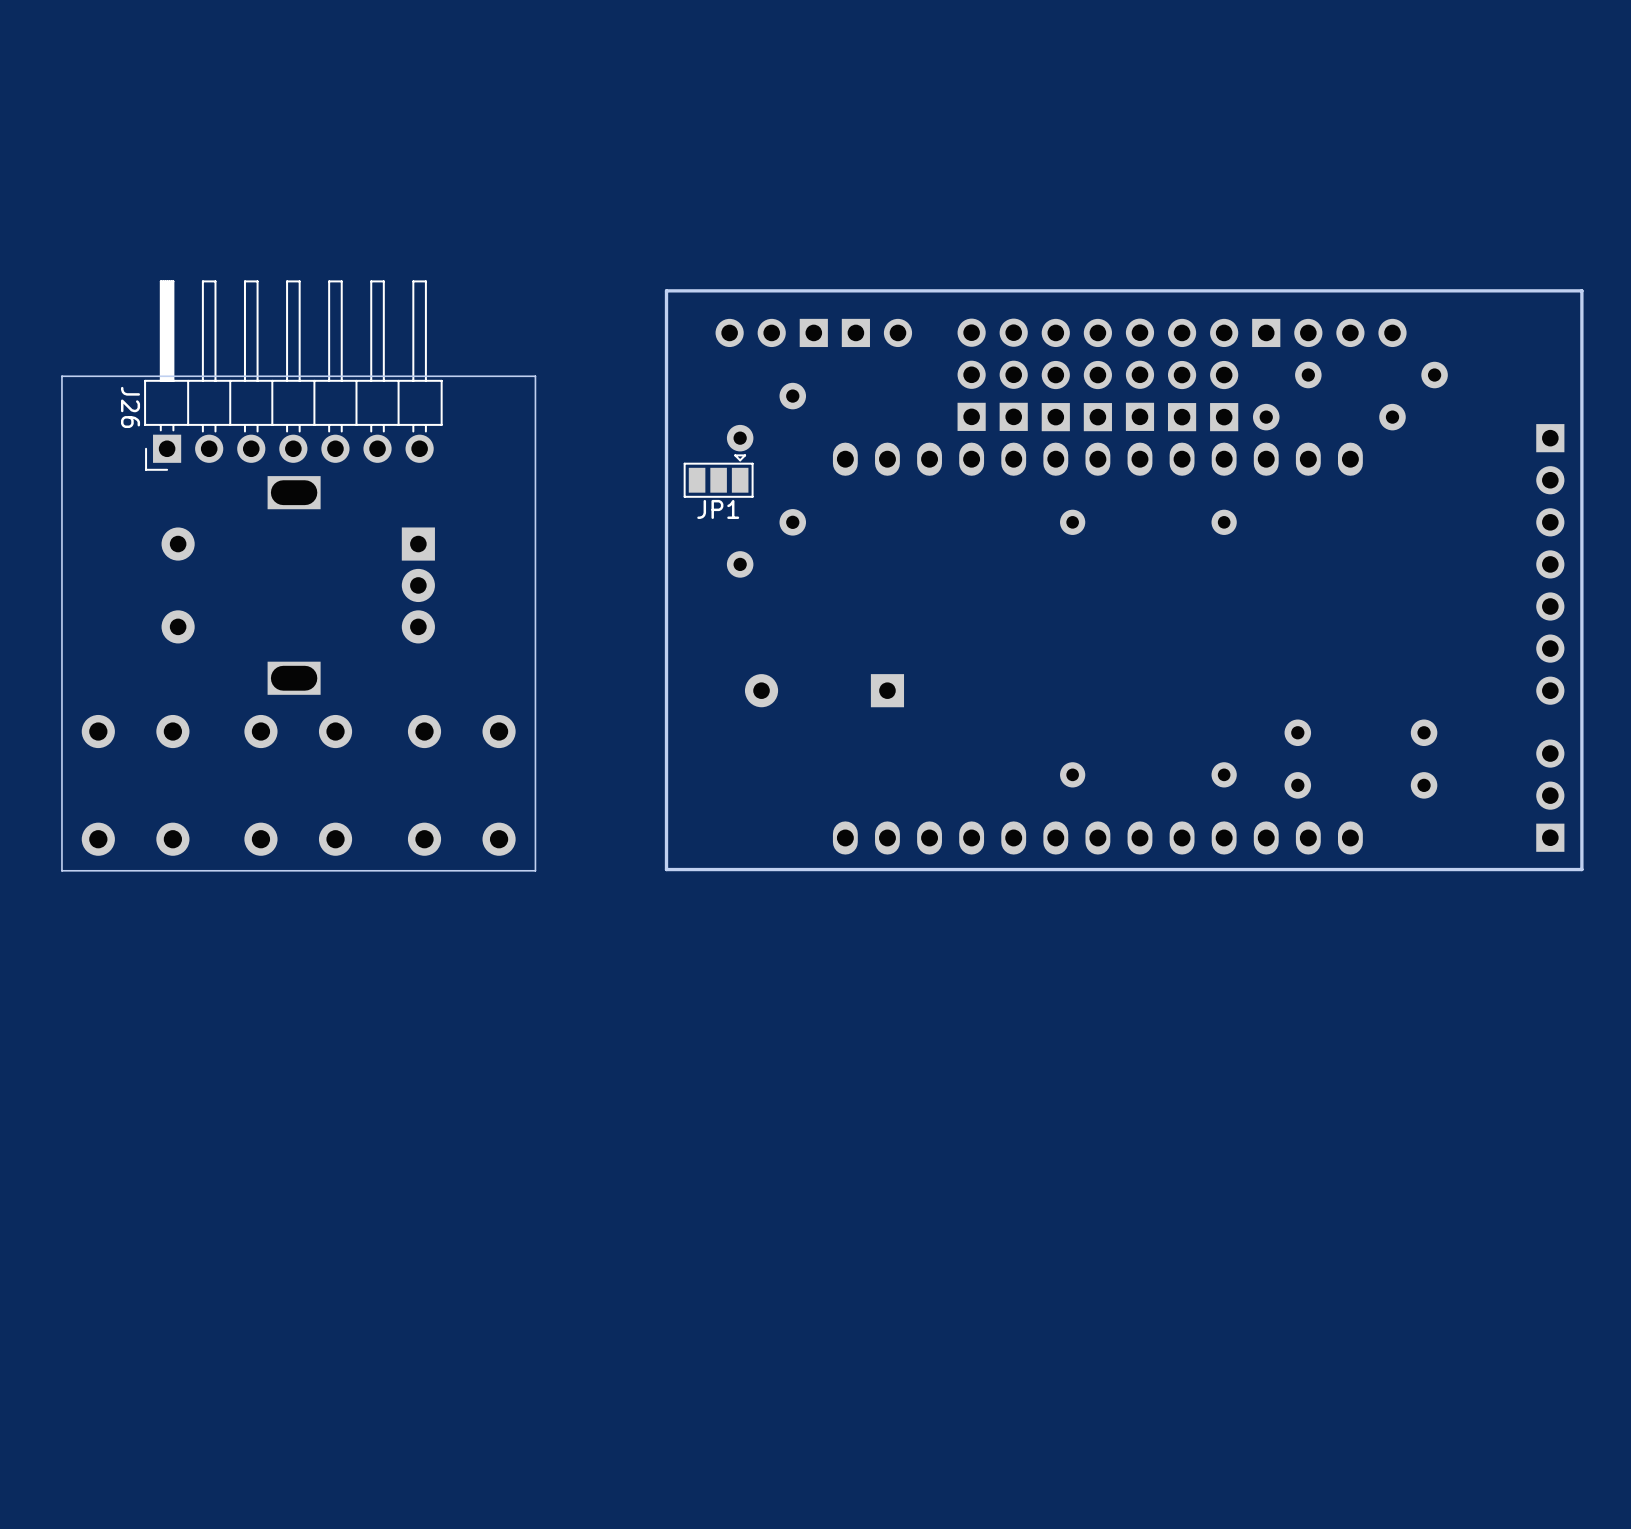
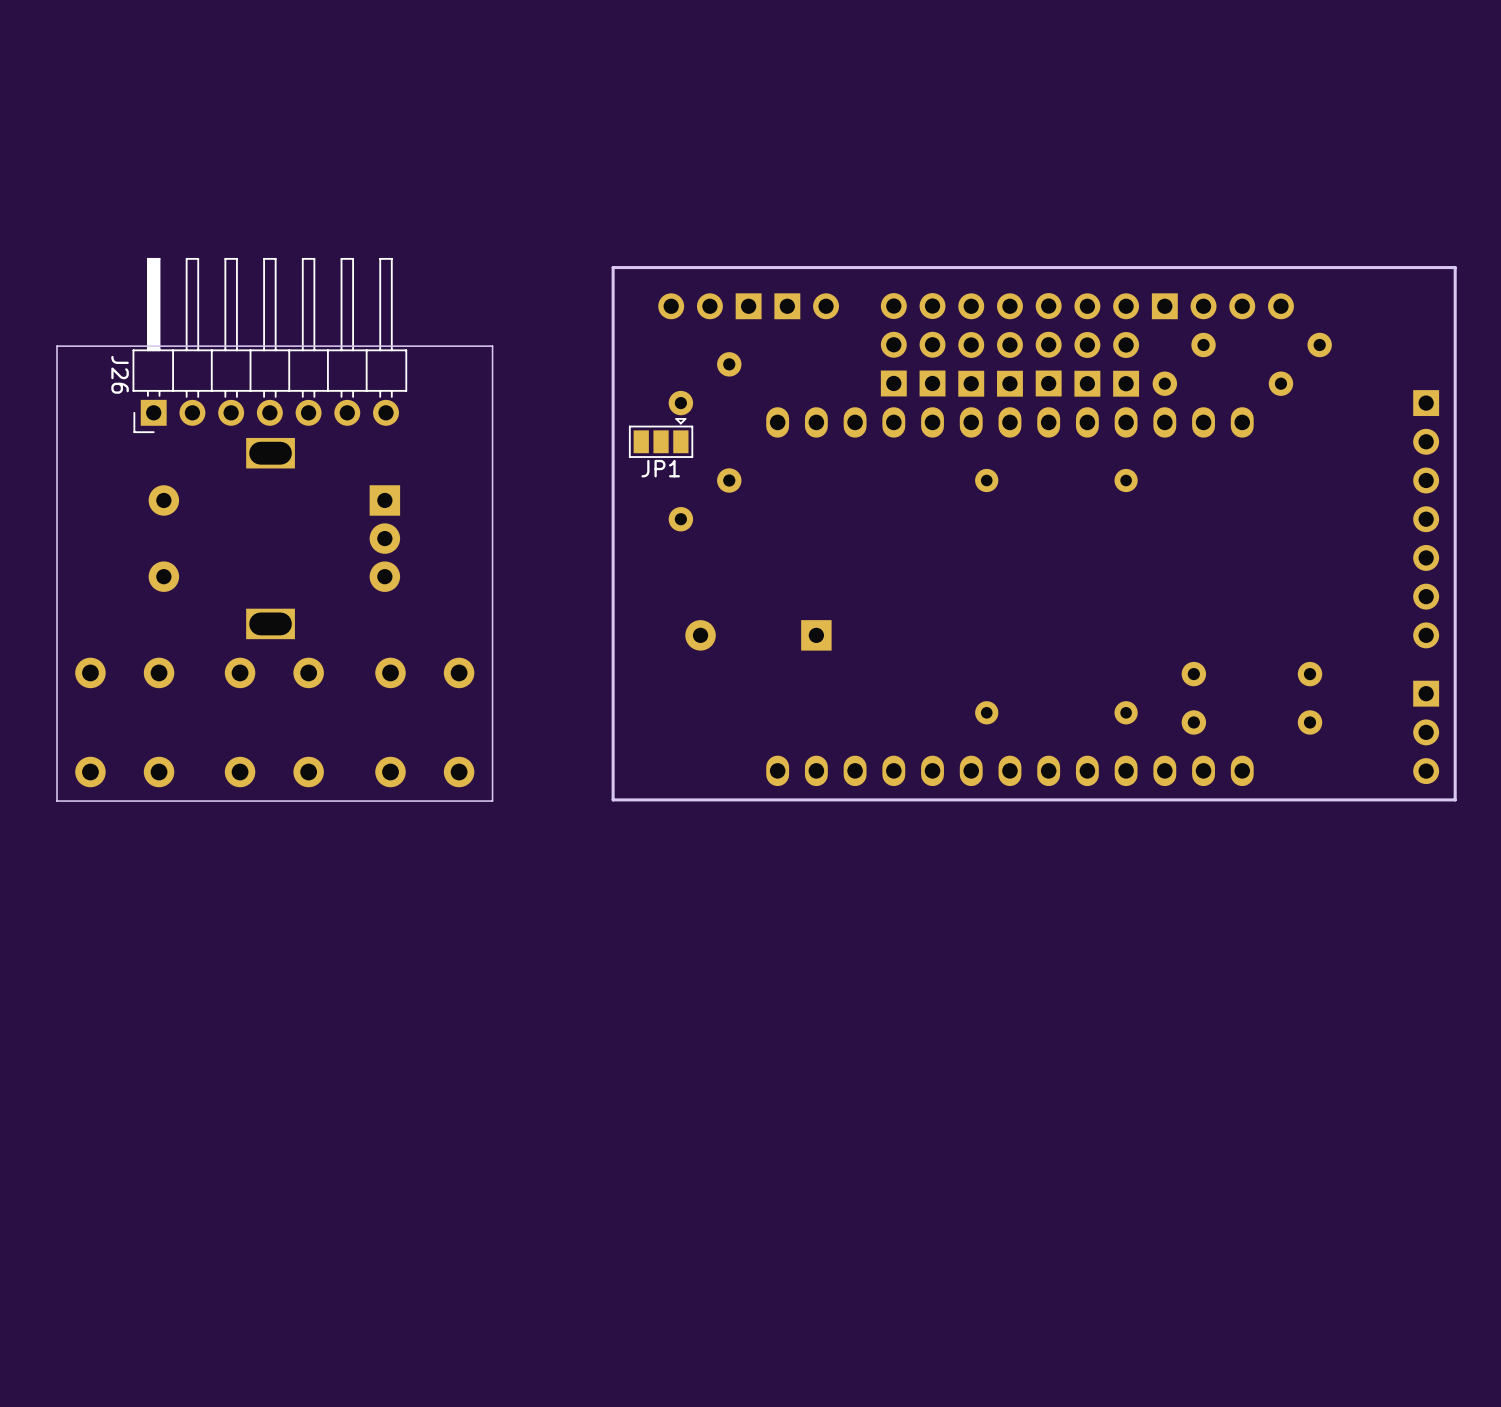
part rotation: 0° (1550, 795) -> 180° (1426, 732)

